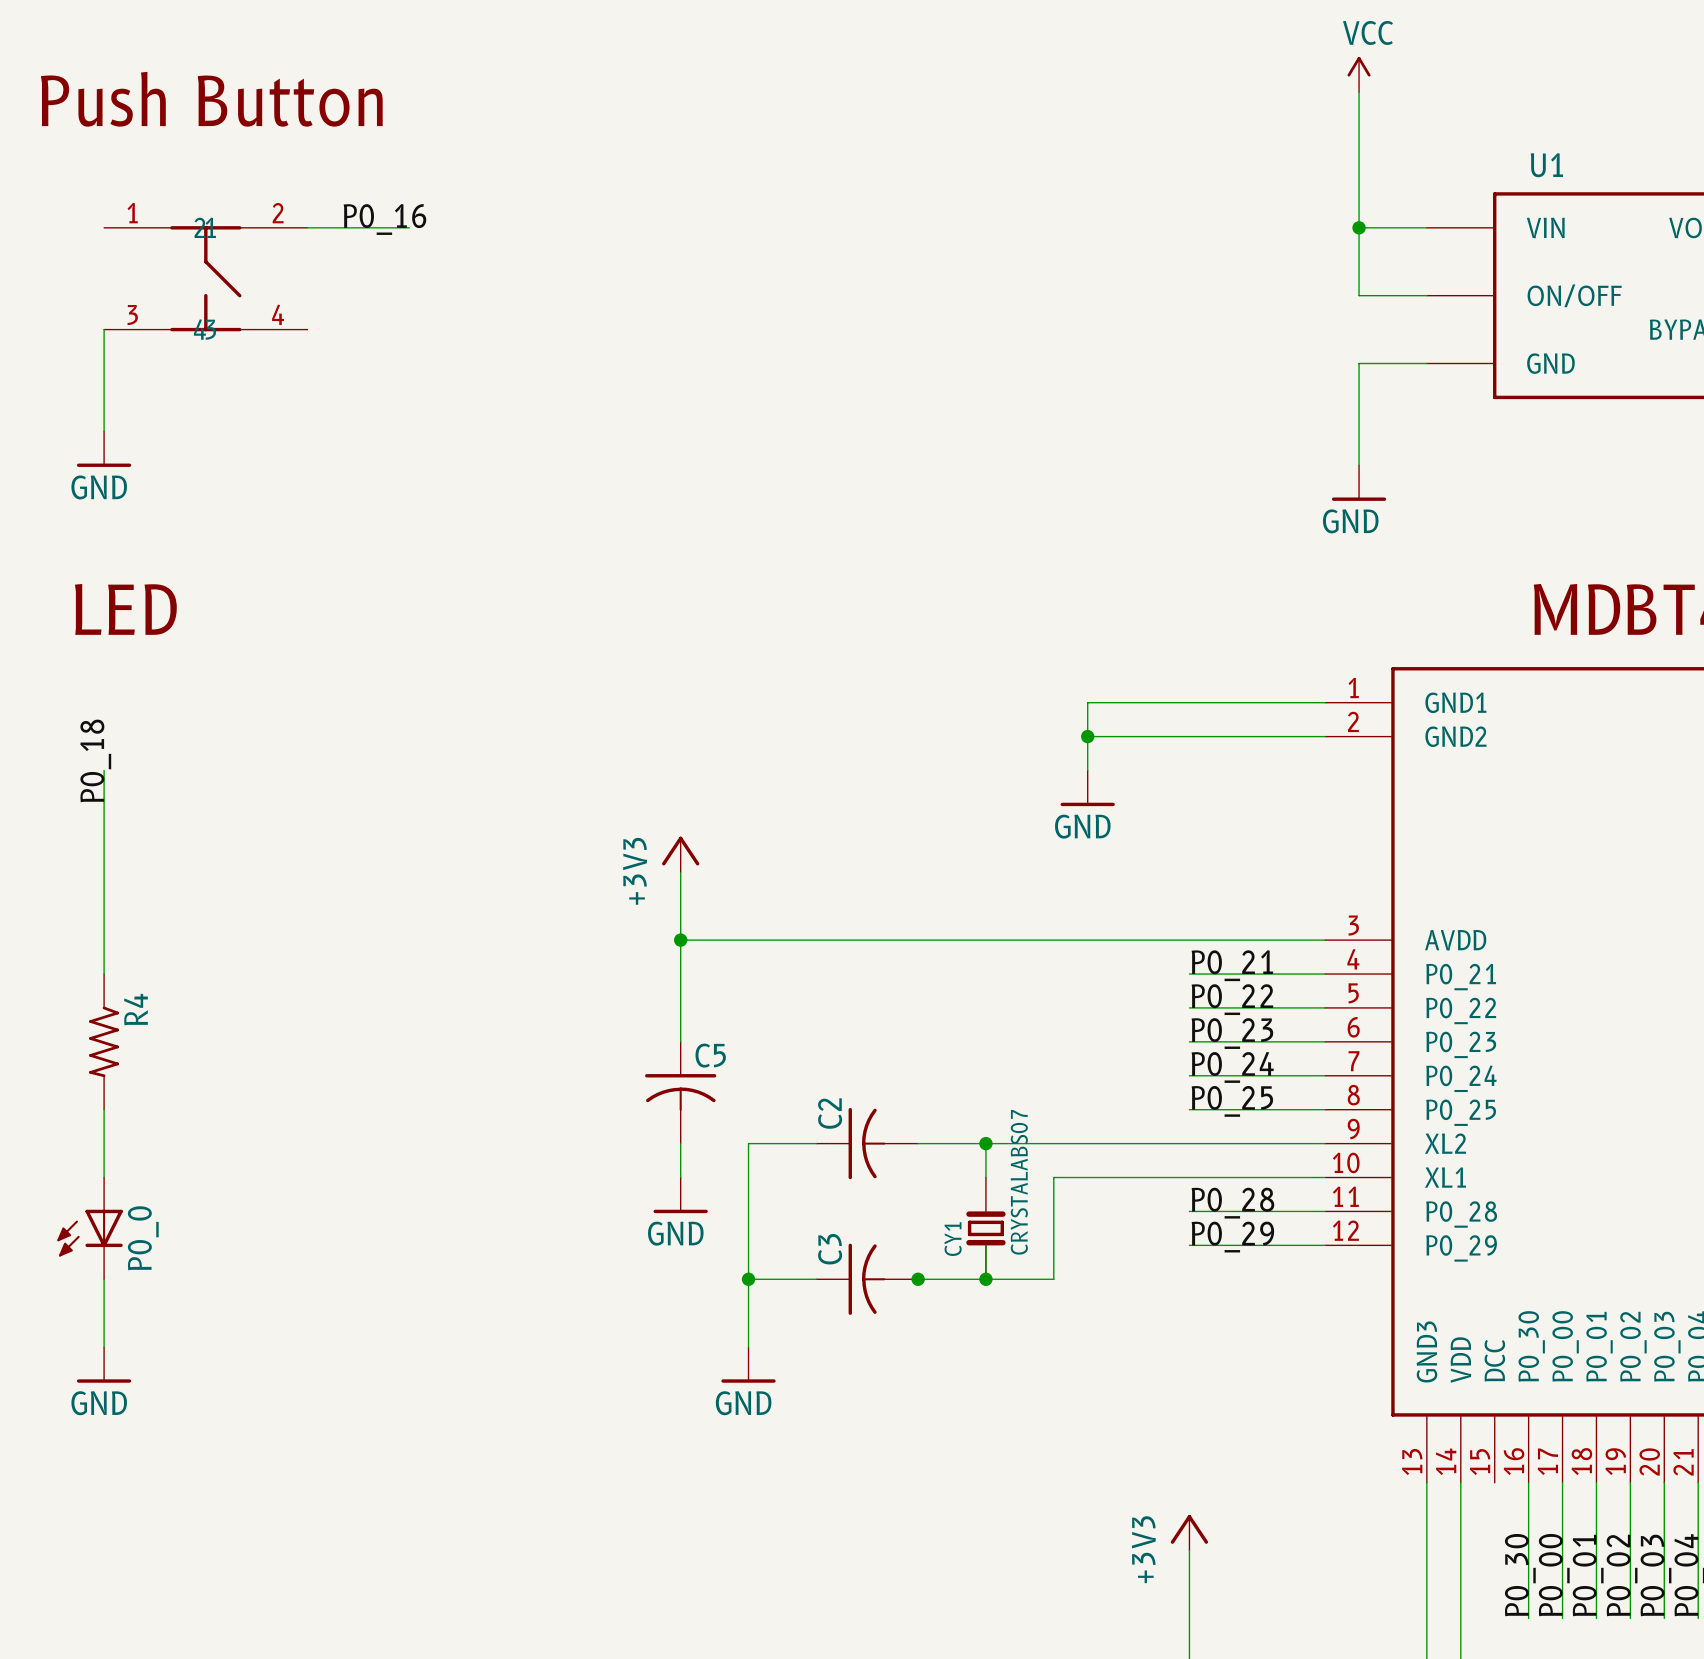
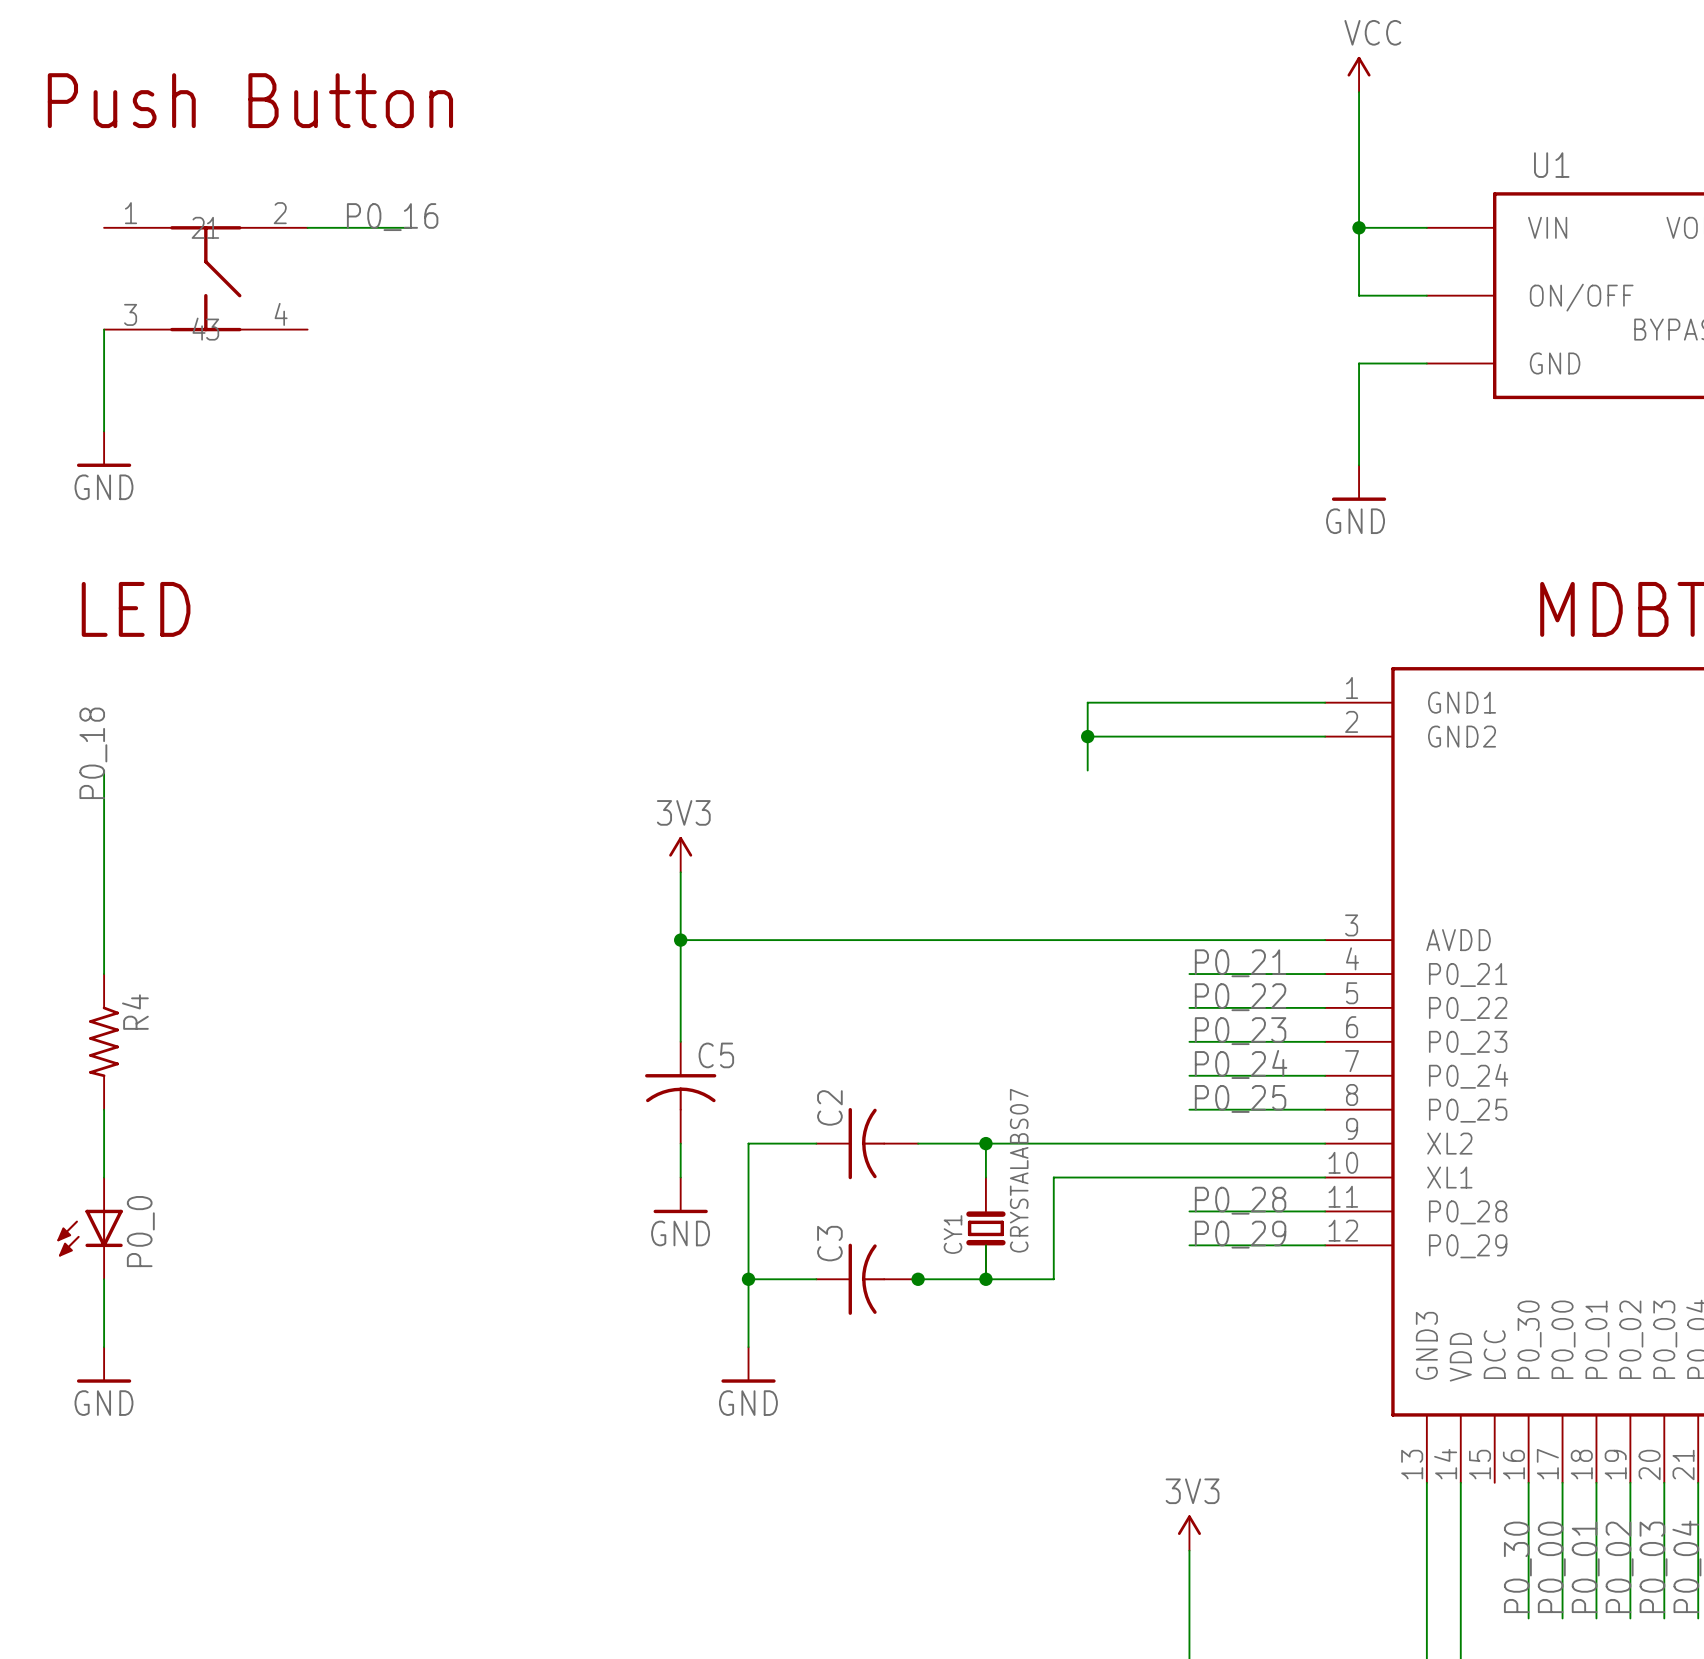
power symbol: GND (1087, 788) -> none
power symbol: +3V3 (680, 854) -> 3V3 (680, 854)
power symbol: +3V3 (1189, 1532) -> 3V3 (1189, 1532)

